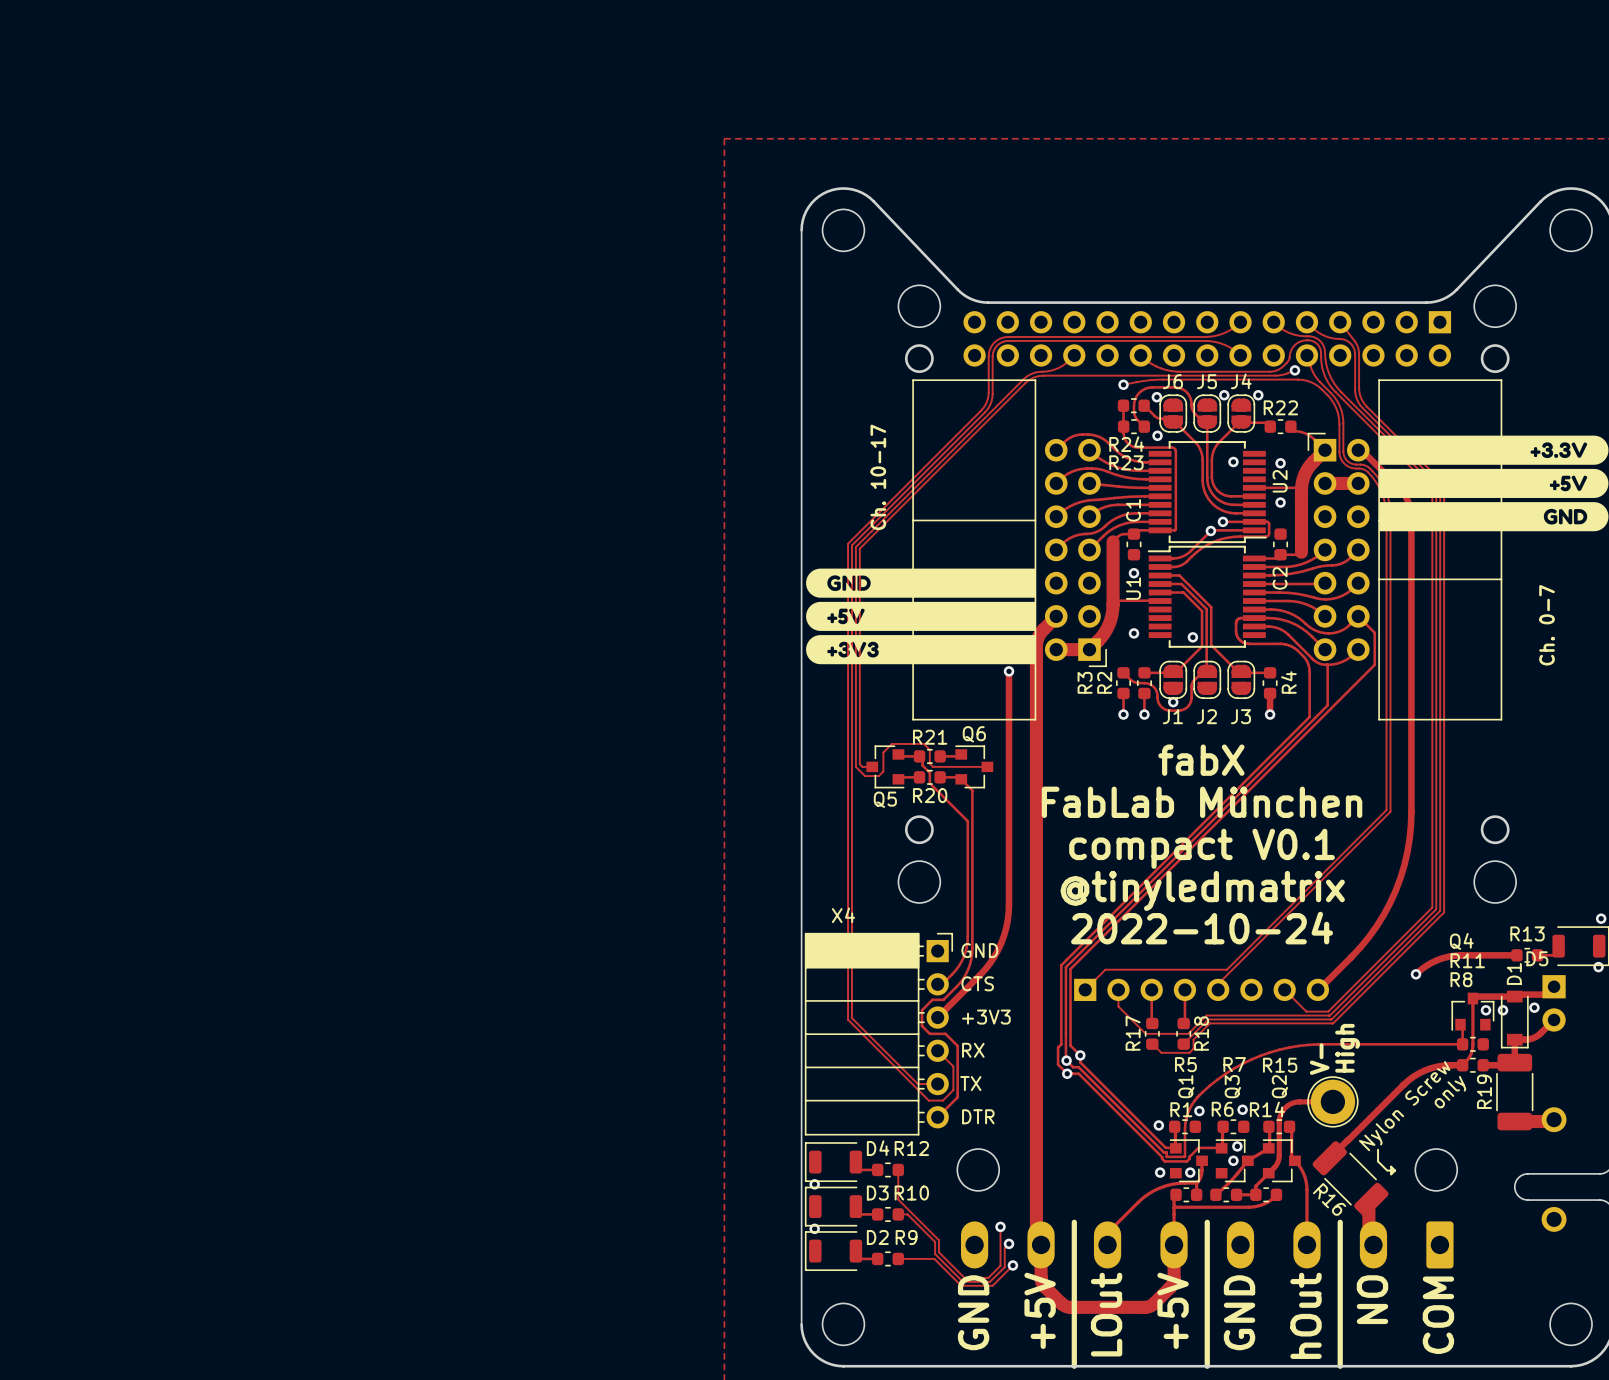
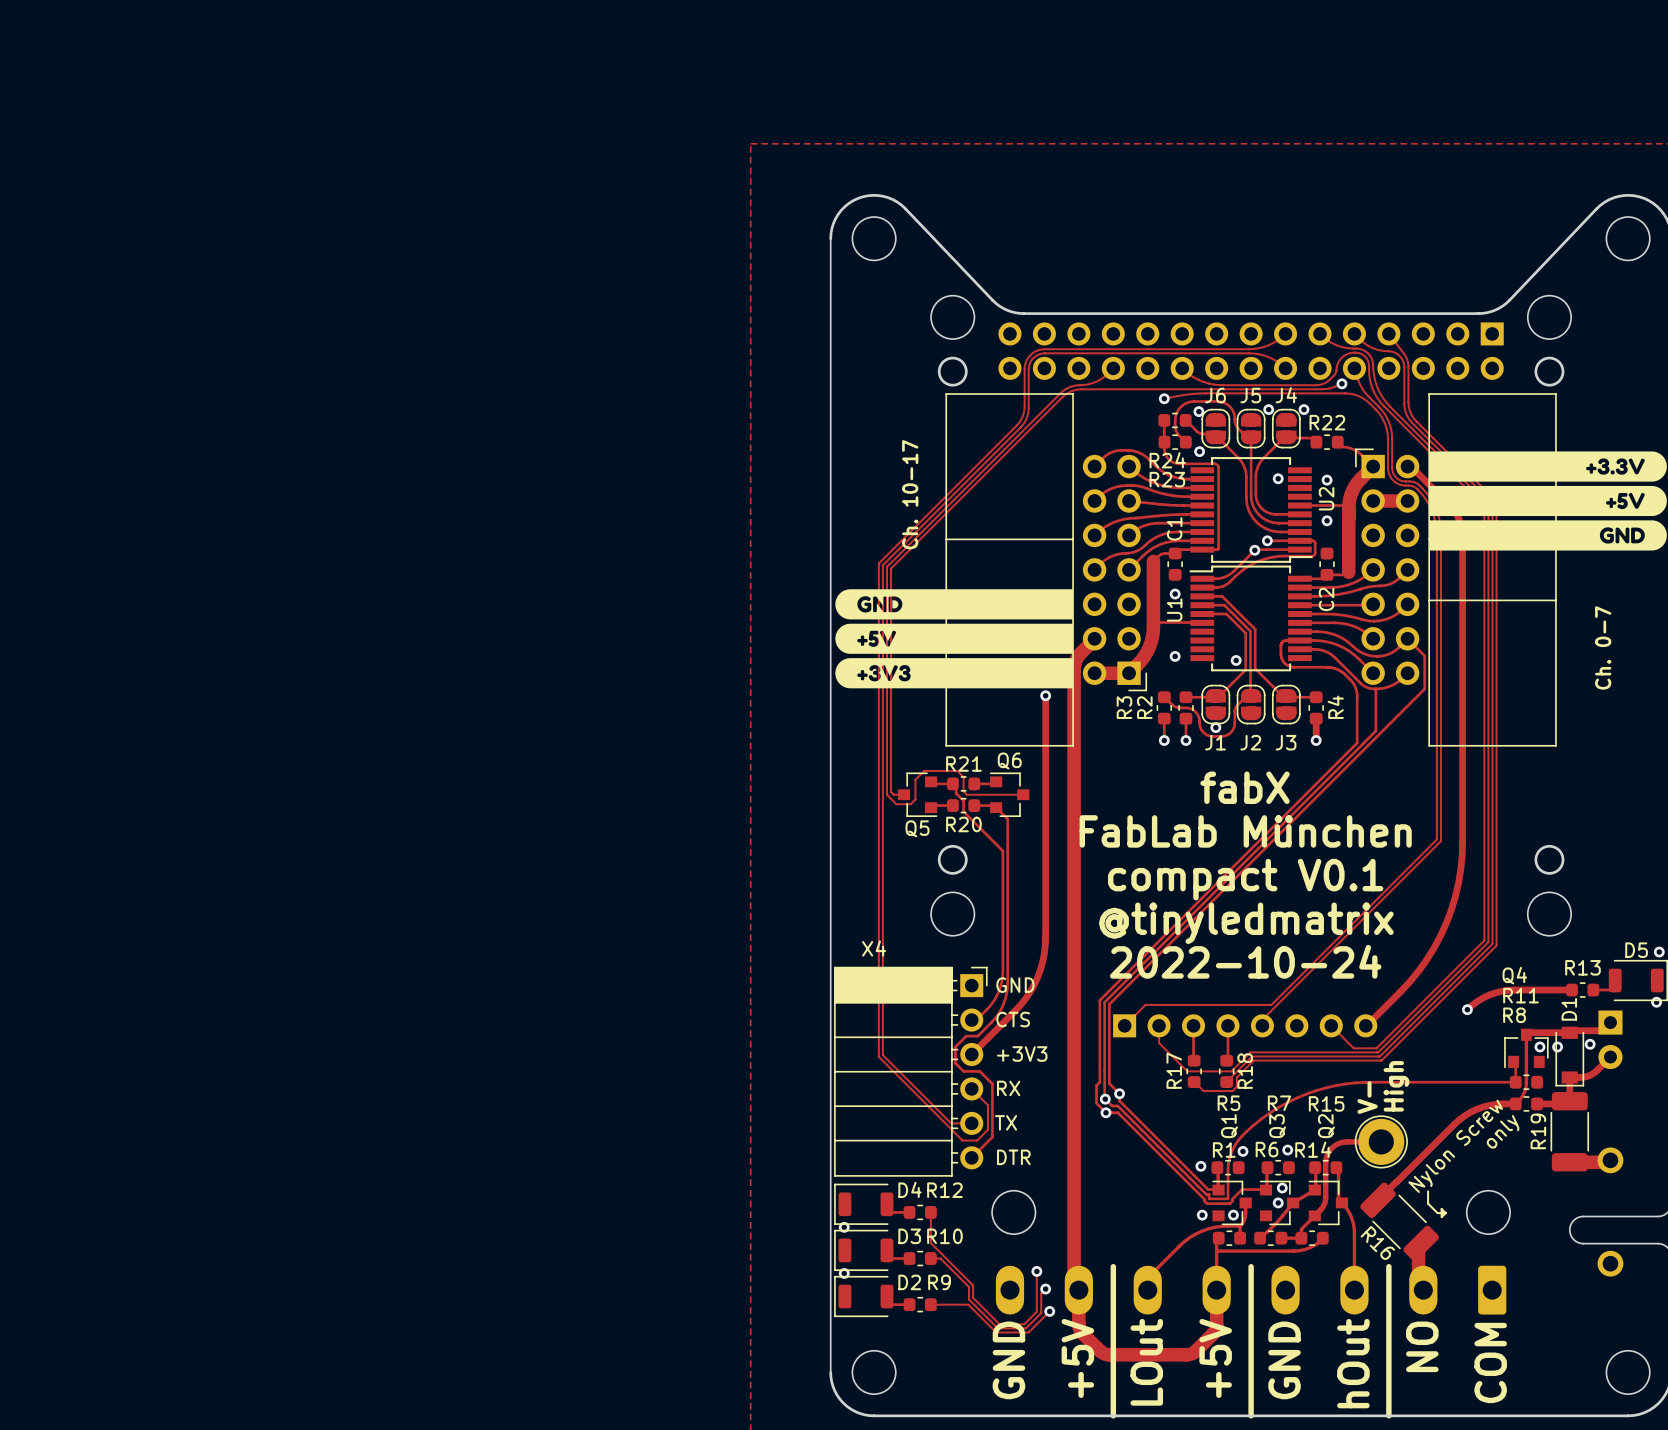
D5 name position: D5 (1537, 958) -> D5 (1636, 950)

